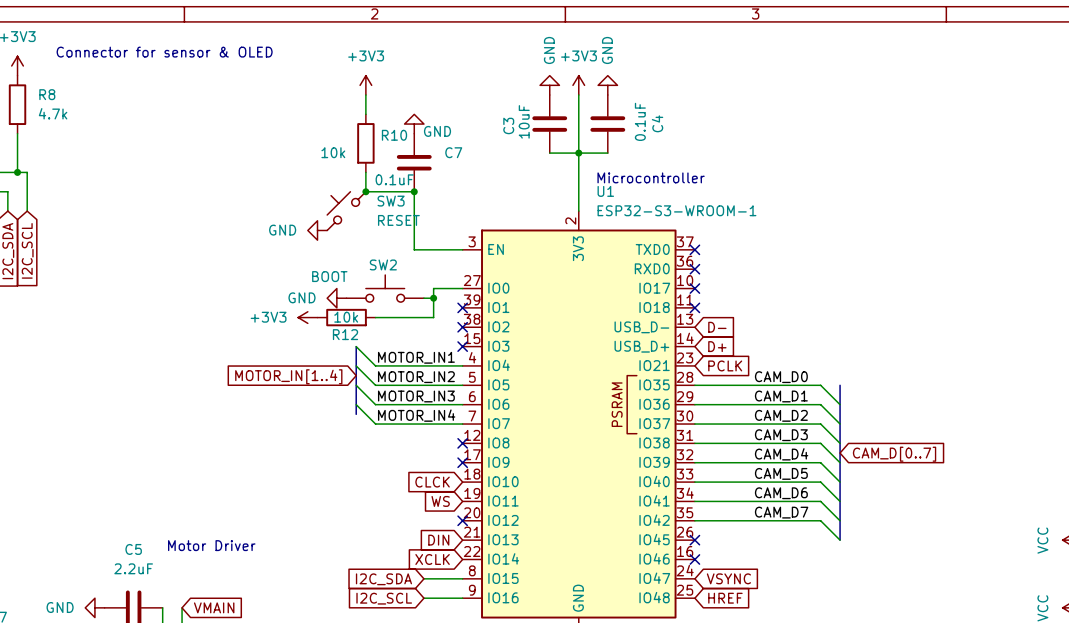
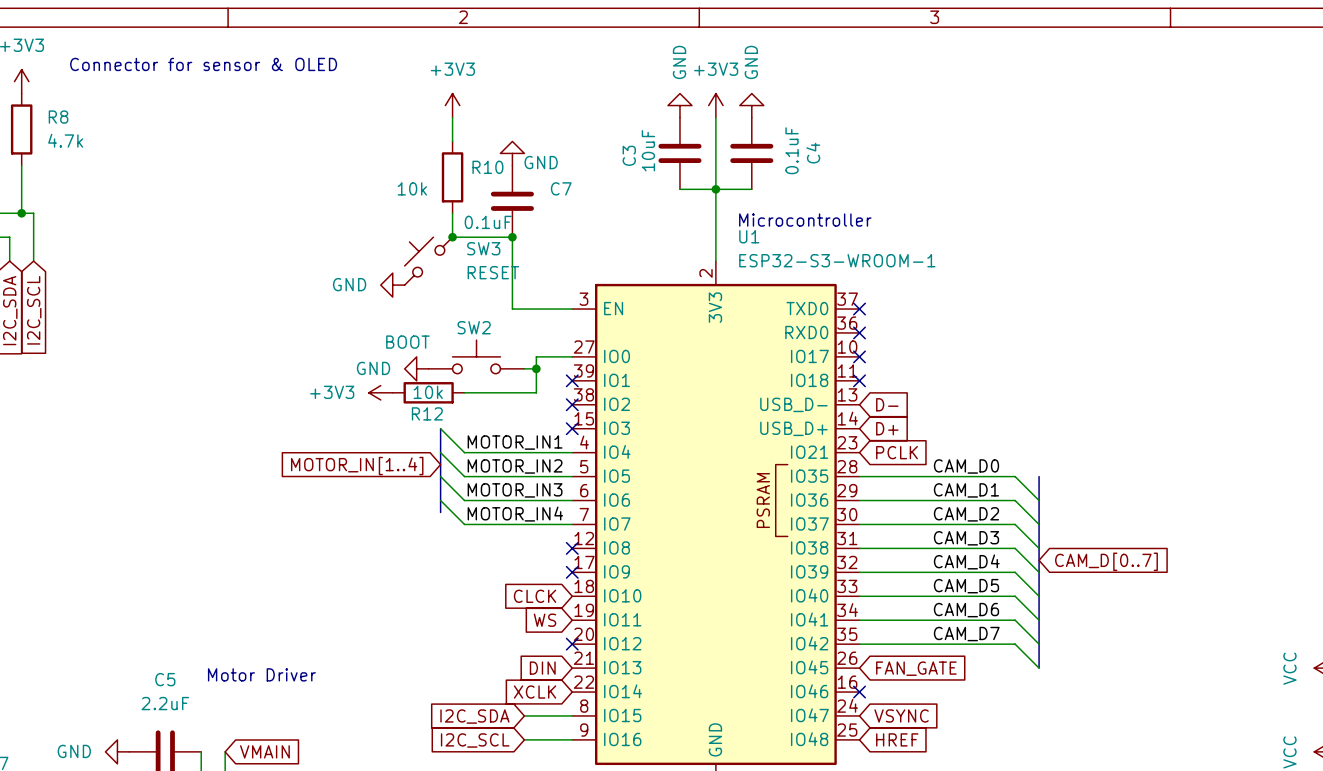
no-connect mark: (694, 540) -> none
global label: none -> FAN_GATE (916, 668)

